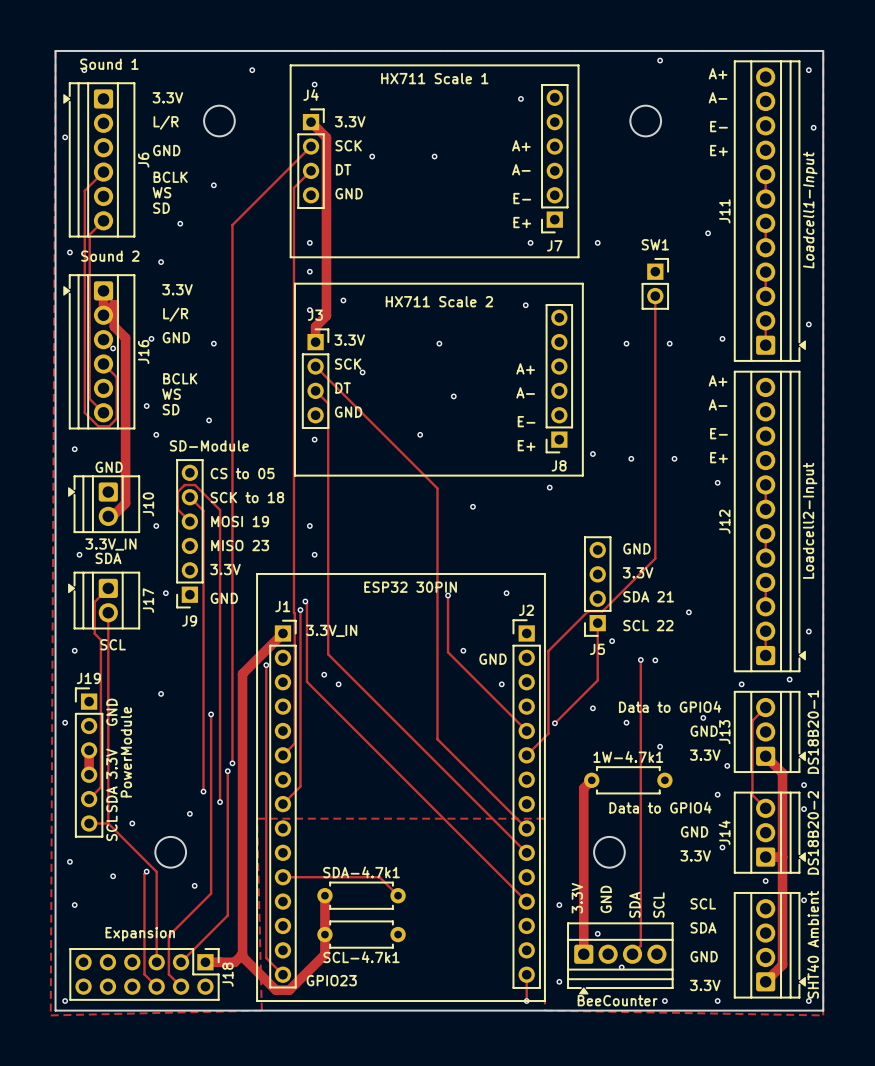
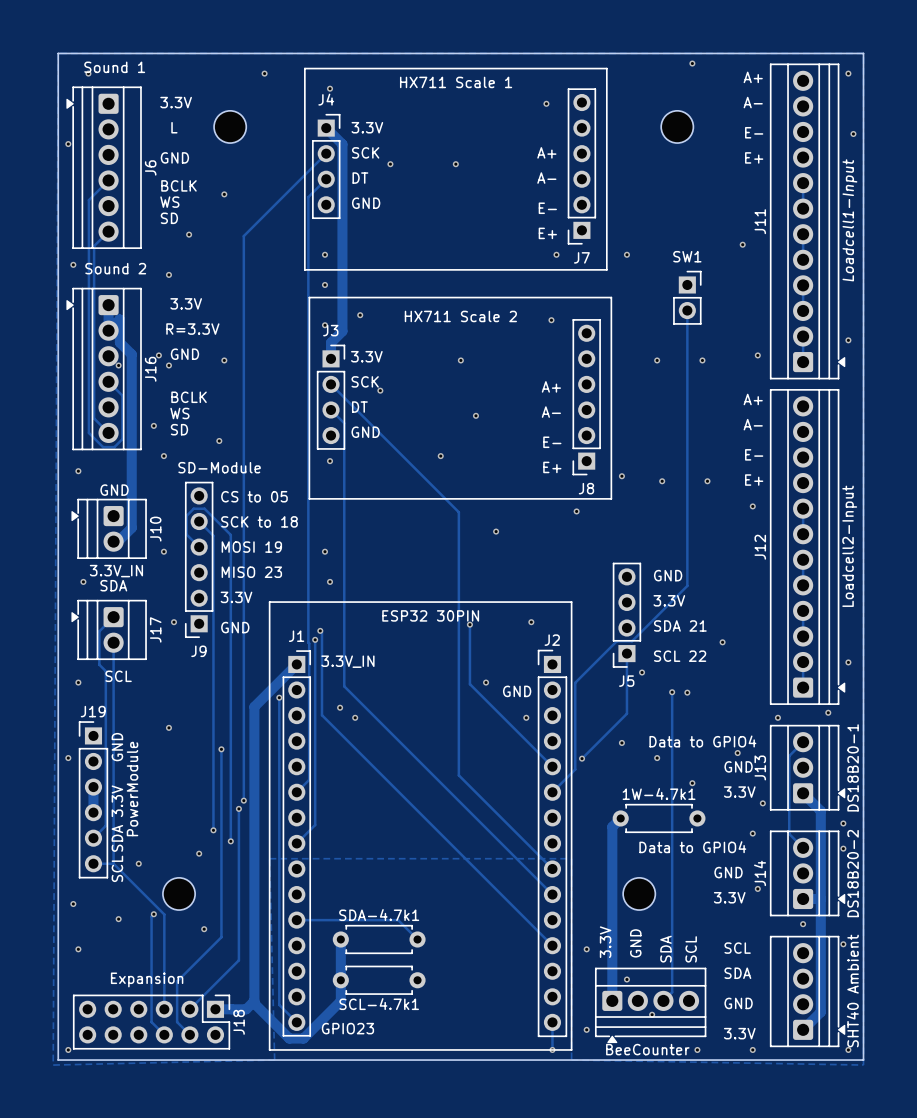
text: L/R (166, 122) -> L (174, 127)
text: L/R (175, 314) -> R=3.3V (192, 329)
via: none -> (168, 365)

